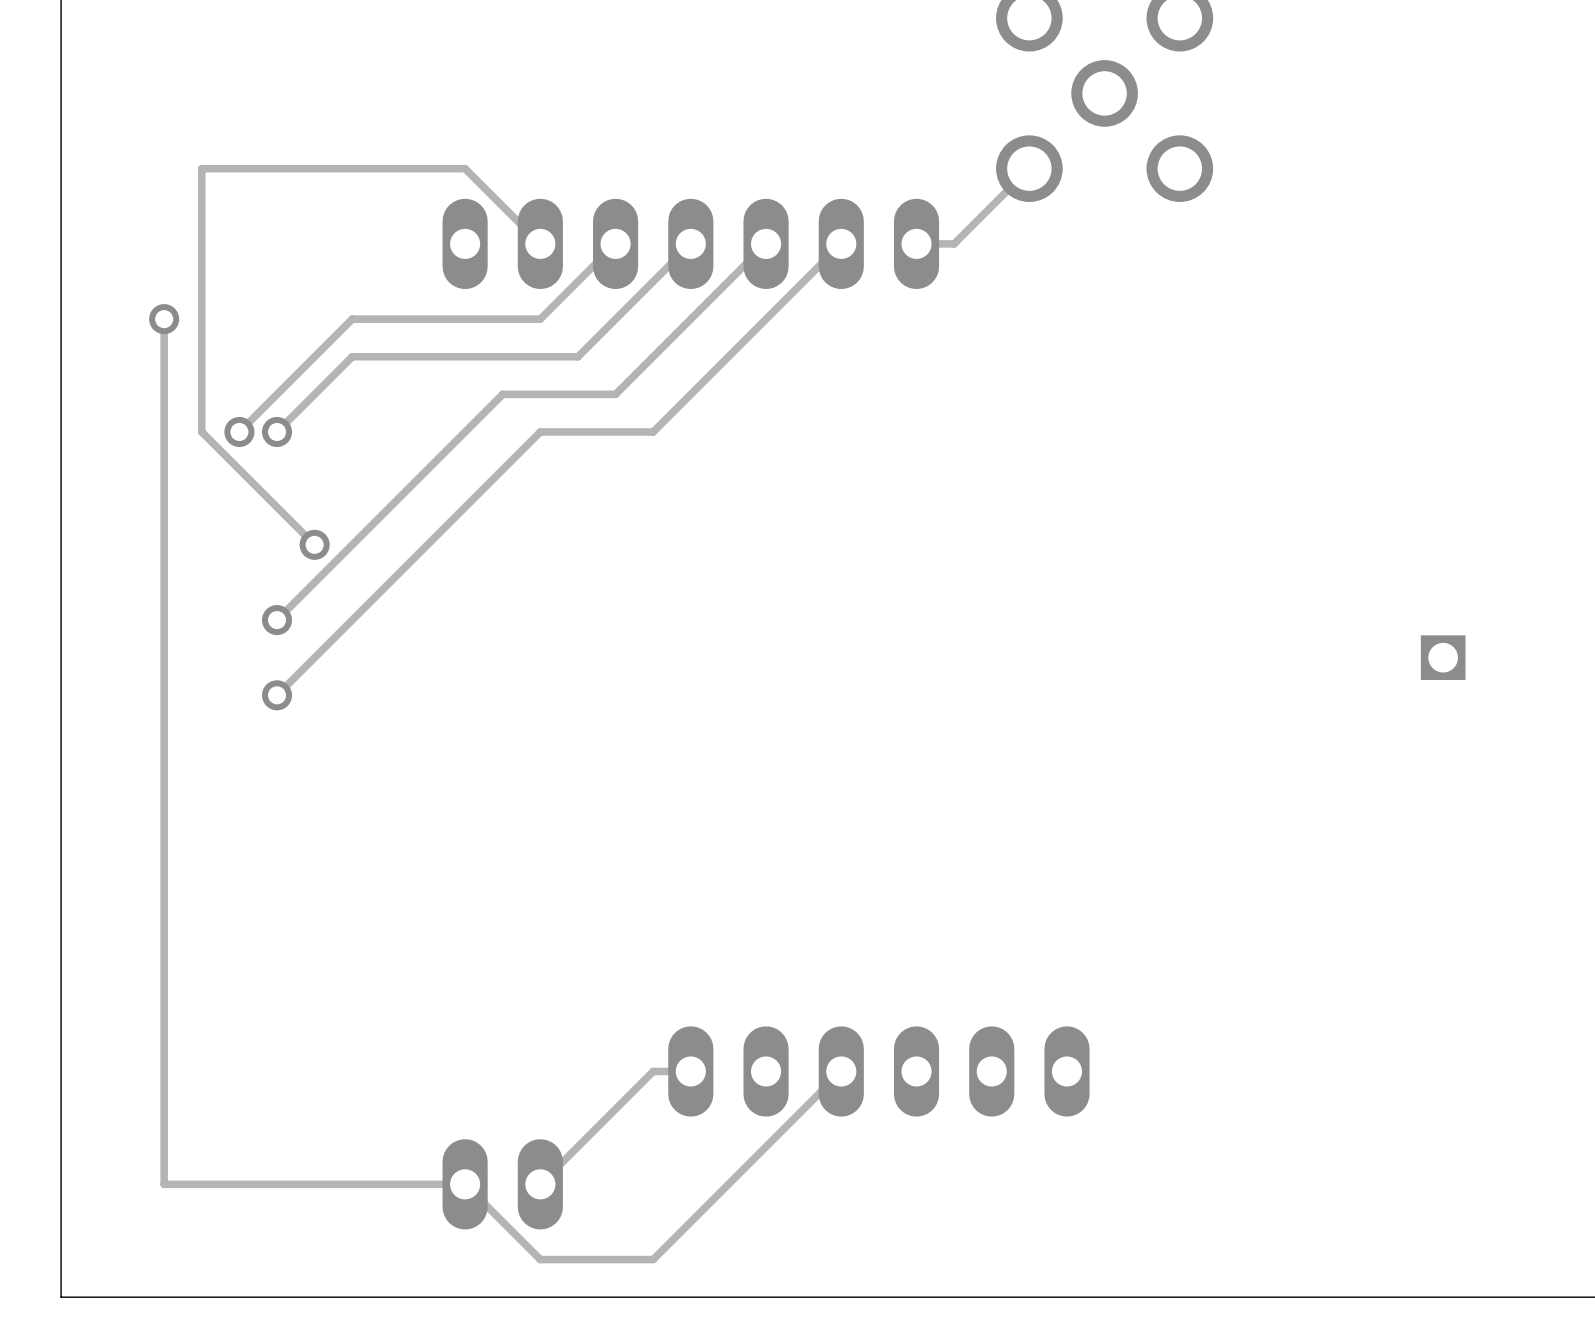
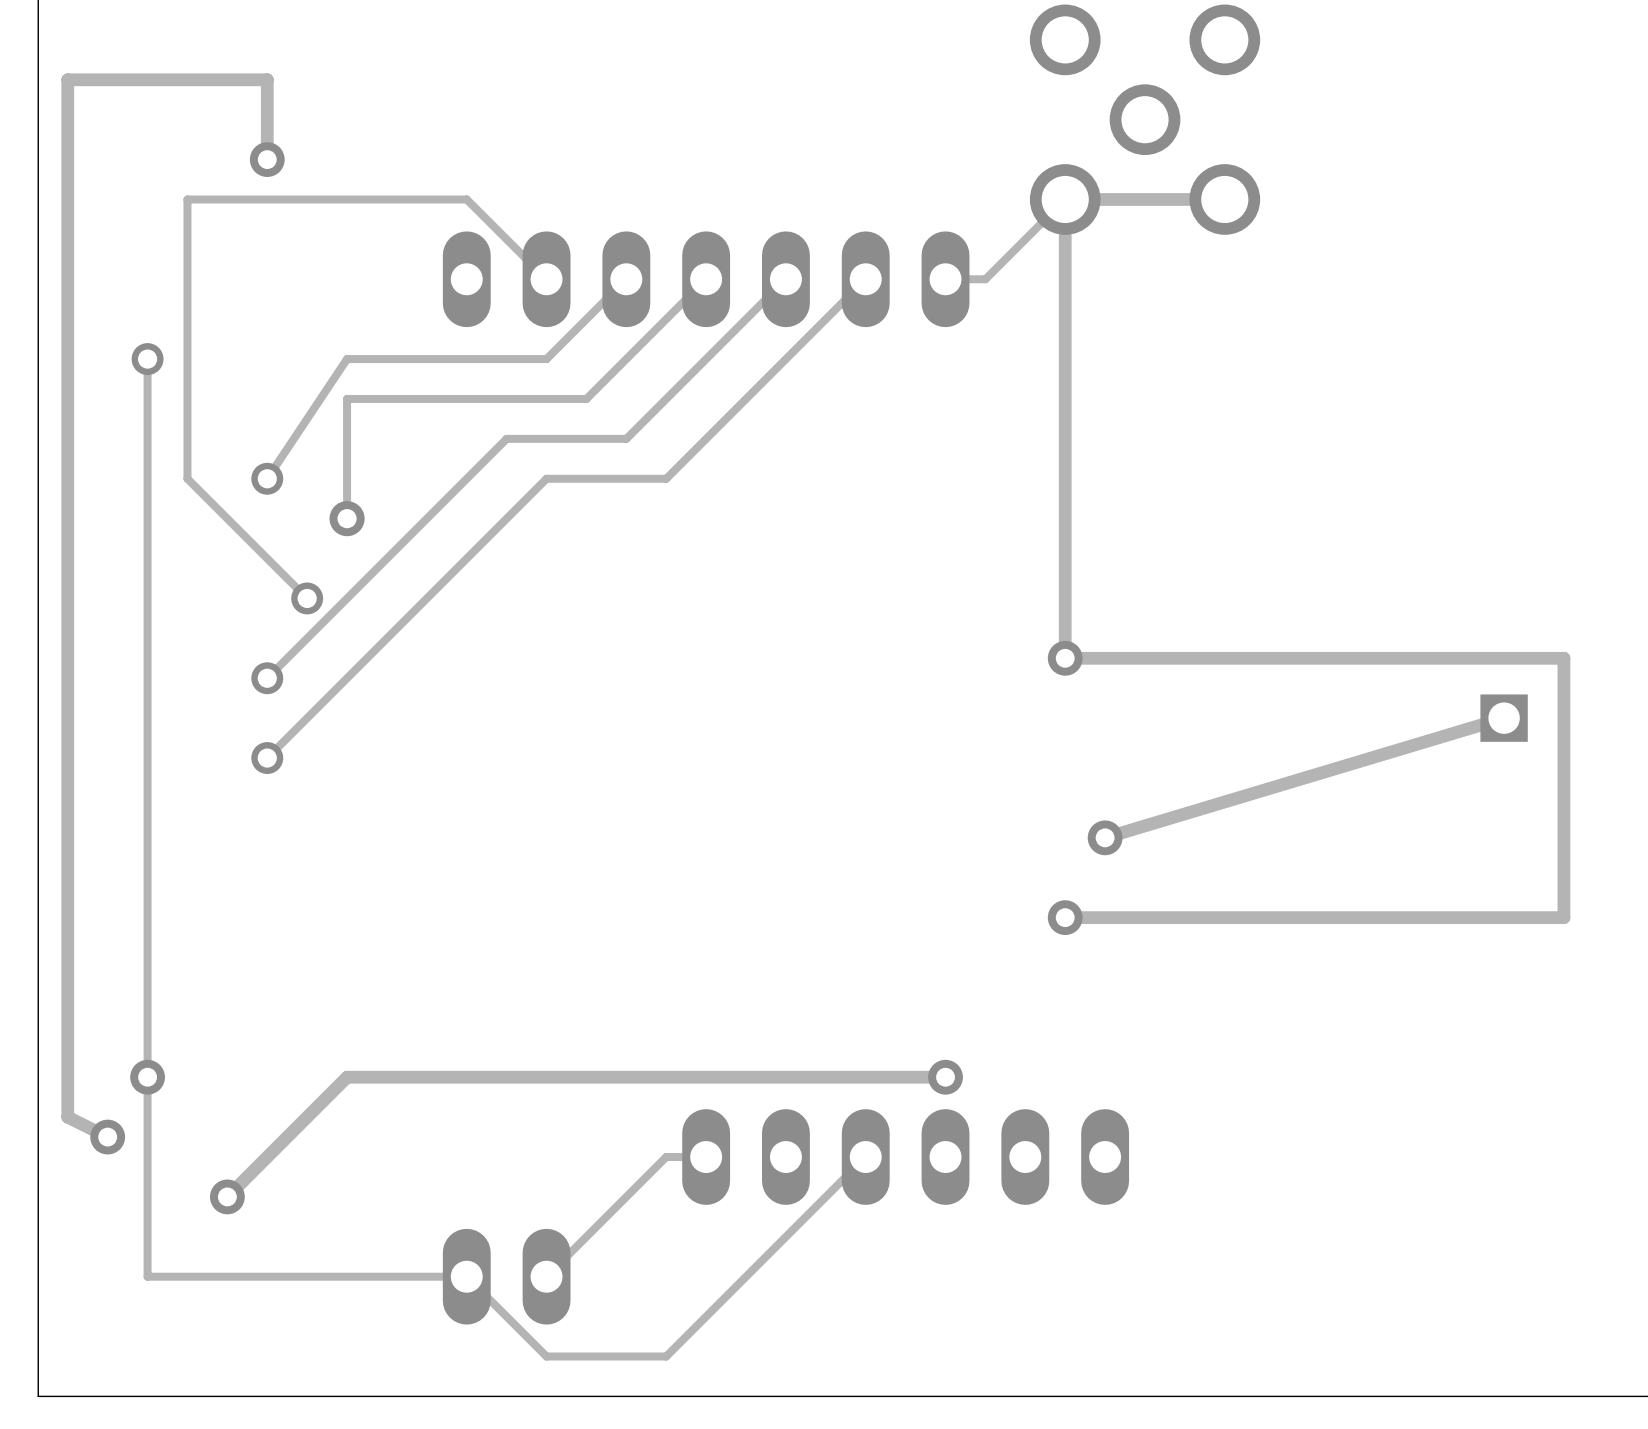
track: none -> (267, 159) (267, 79) (67, 79) (67, 1117) (107, 1137)
via: none -> (267, 159)
track: none -> (1224, 199) (1065, 199) (1065, 658) (1563, 658) (1563, 917) (1065, 917)
track: (352, 319) (239, 431) -> (347, 359) (267, 478)
track: (352, 356) (277, 431) -> (347, 398) (347, 518)
via: (239, 431) -> none
via: none -> (347, 518)
via: none -> (1065, 658)
track: none -> (1504, 718) (1105, 837)
via: none -> (1105, 837)
via: none -> (1065, 917)
via: none -> (147, 1077)
track: none -> (945, 1077) (347, 1077) (227, 1196)
via: none -> (945, 1077)
via: none -> (107, 1137)
via: none -> (227, 1196)

